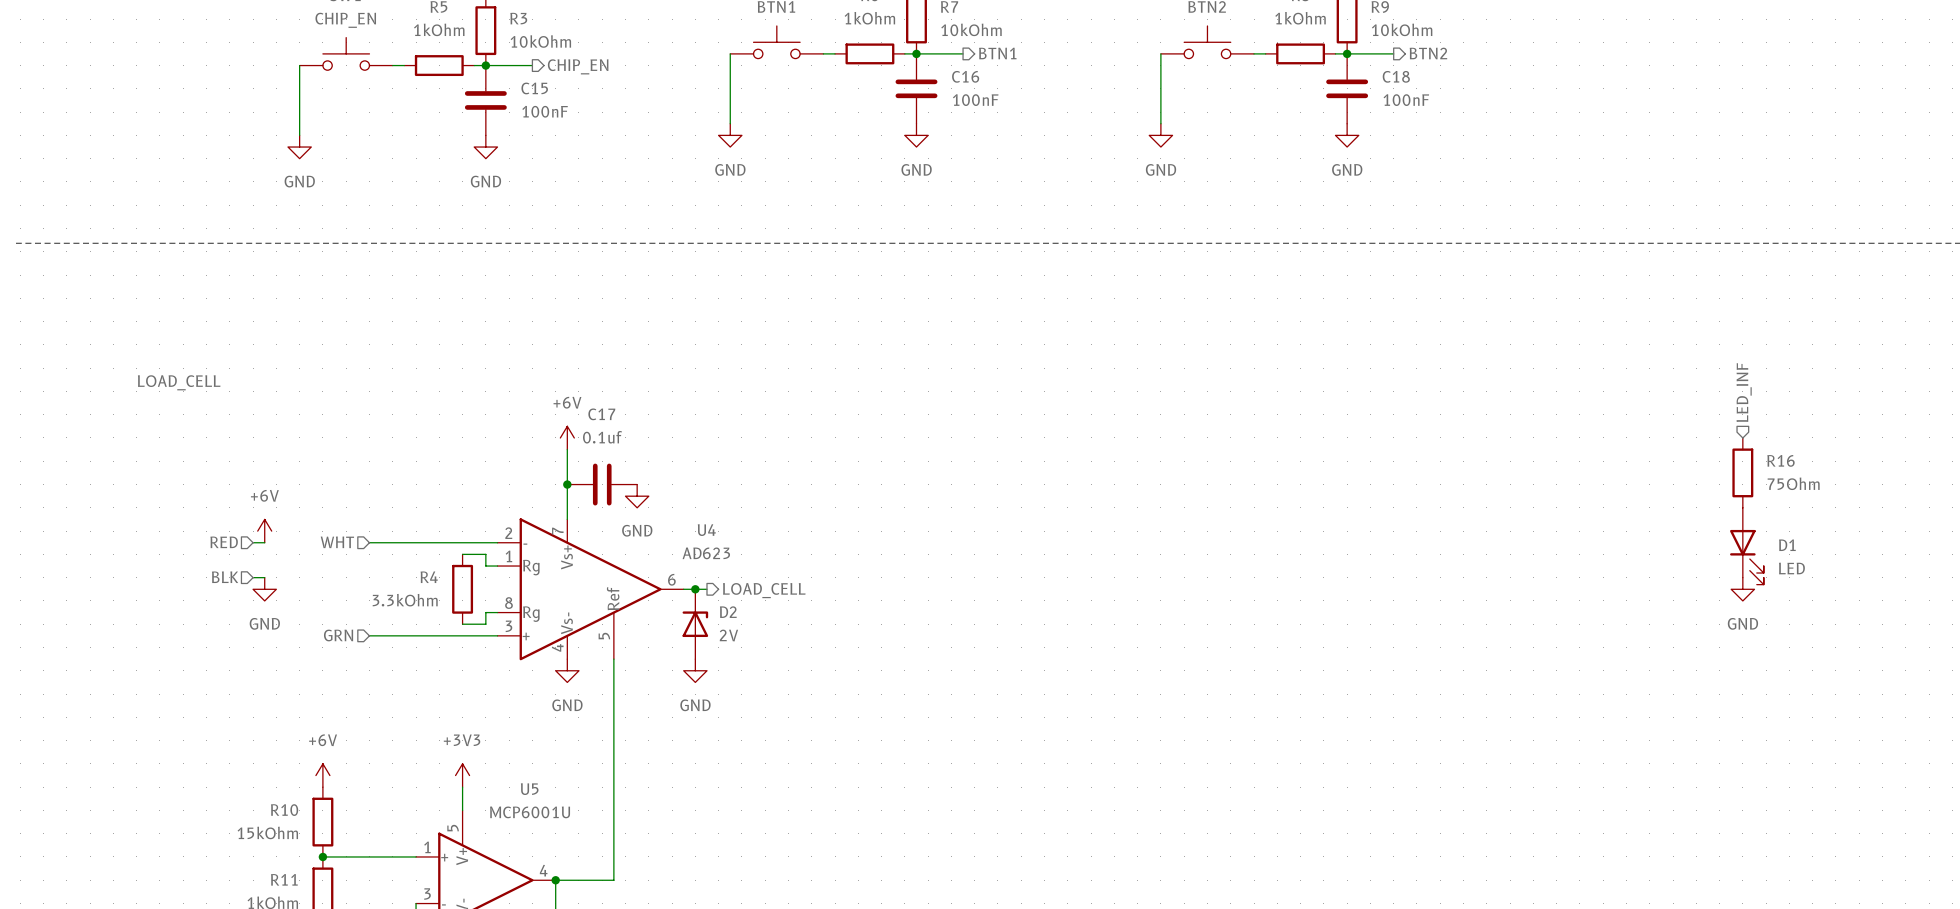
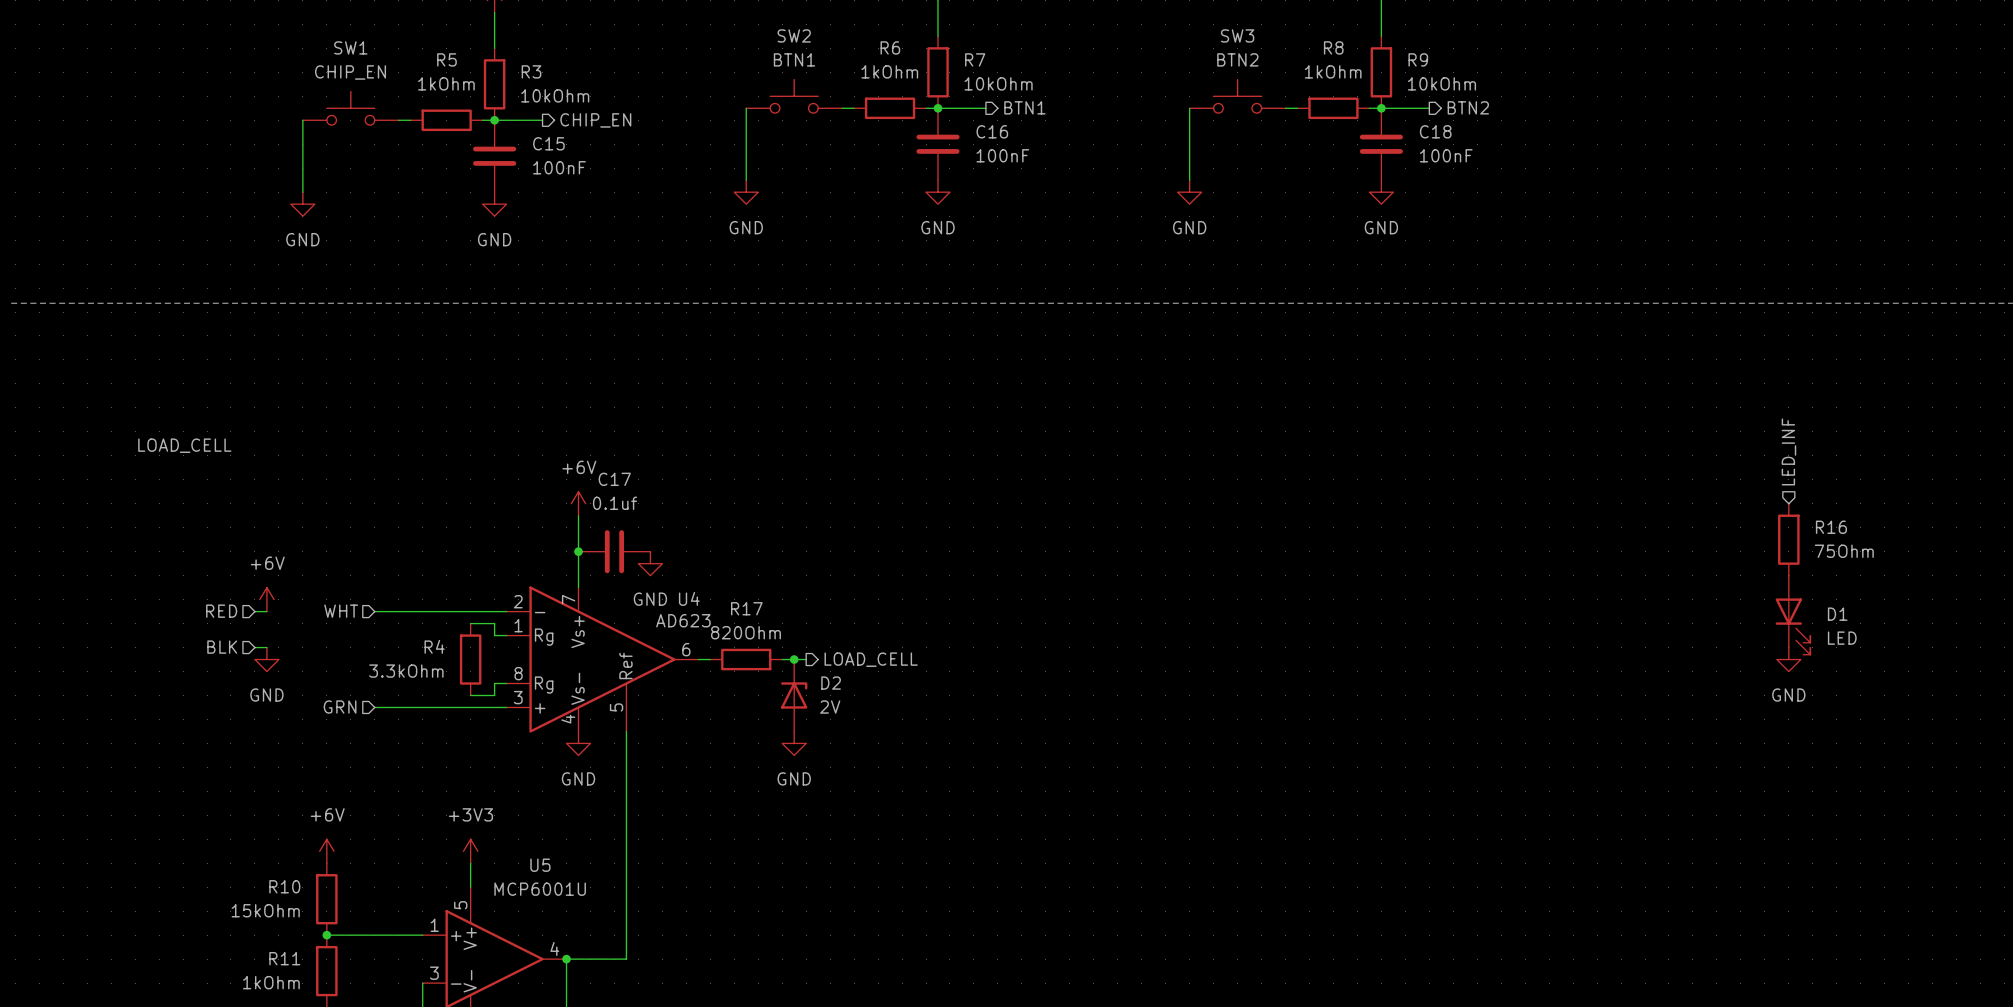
U4 name position: U4 (706, 530) -> U4 (689, 598)
U4 value position: AD623 (706, 553) -> AD623 (683, 620)
junction: (695, 589) -> none
R17: none -> 820Ohm (746, 659)
wire: none -> (782, 659) (806, 659)
junction: none -> (794, 659)
hierarchical label position: LOAD_CELL (764, 590) -> LOAD_CELL (871, 659)
D2 position: (695, 624) -> (794, 695)
power symbol position: GND (695, 670) -> GND (794, 743)

